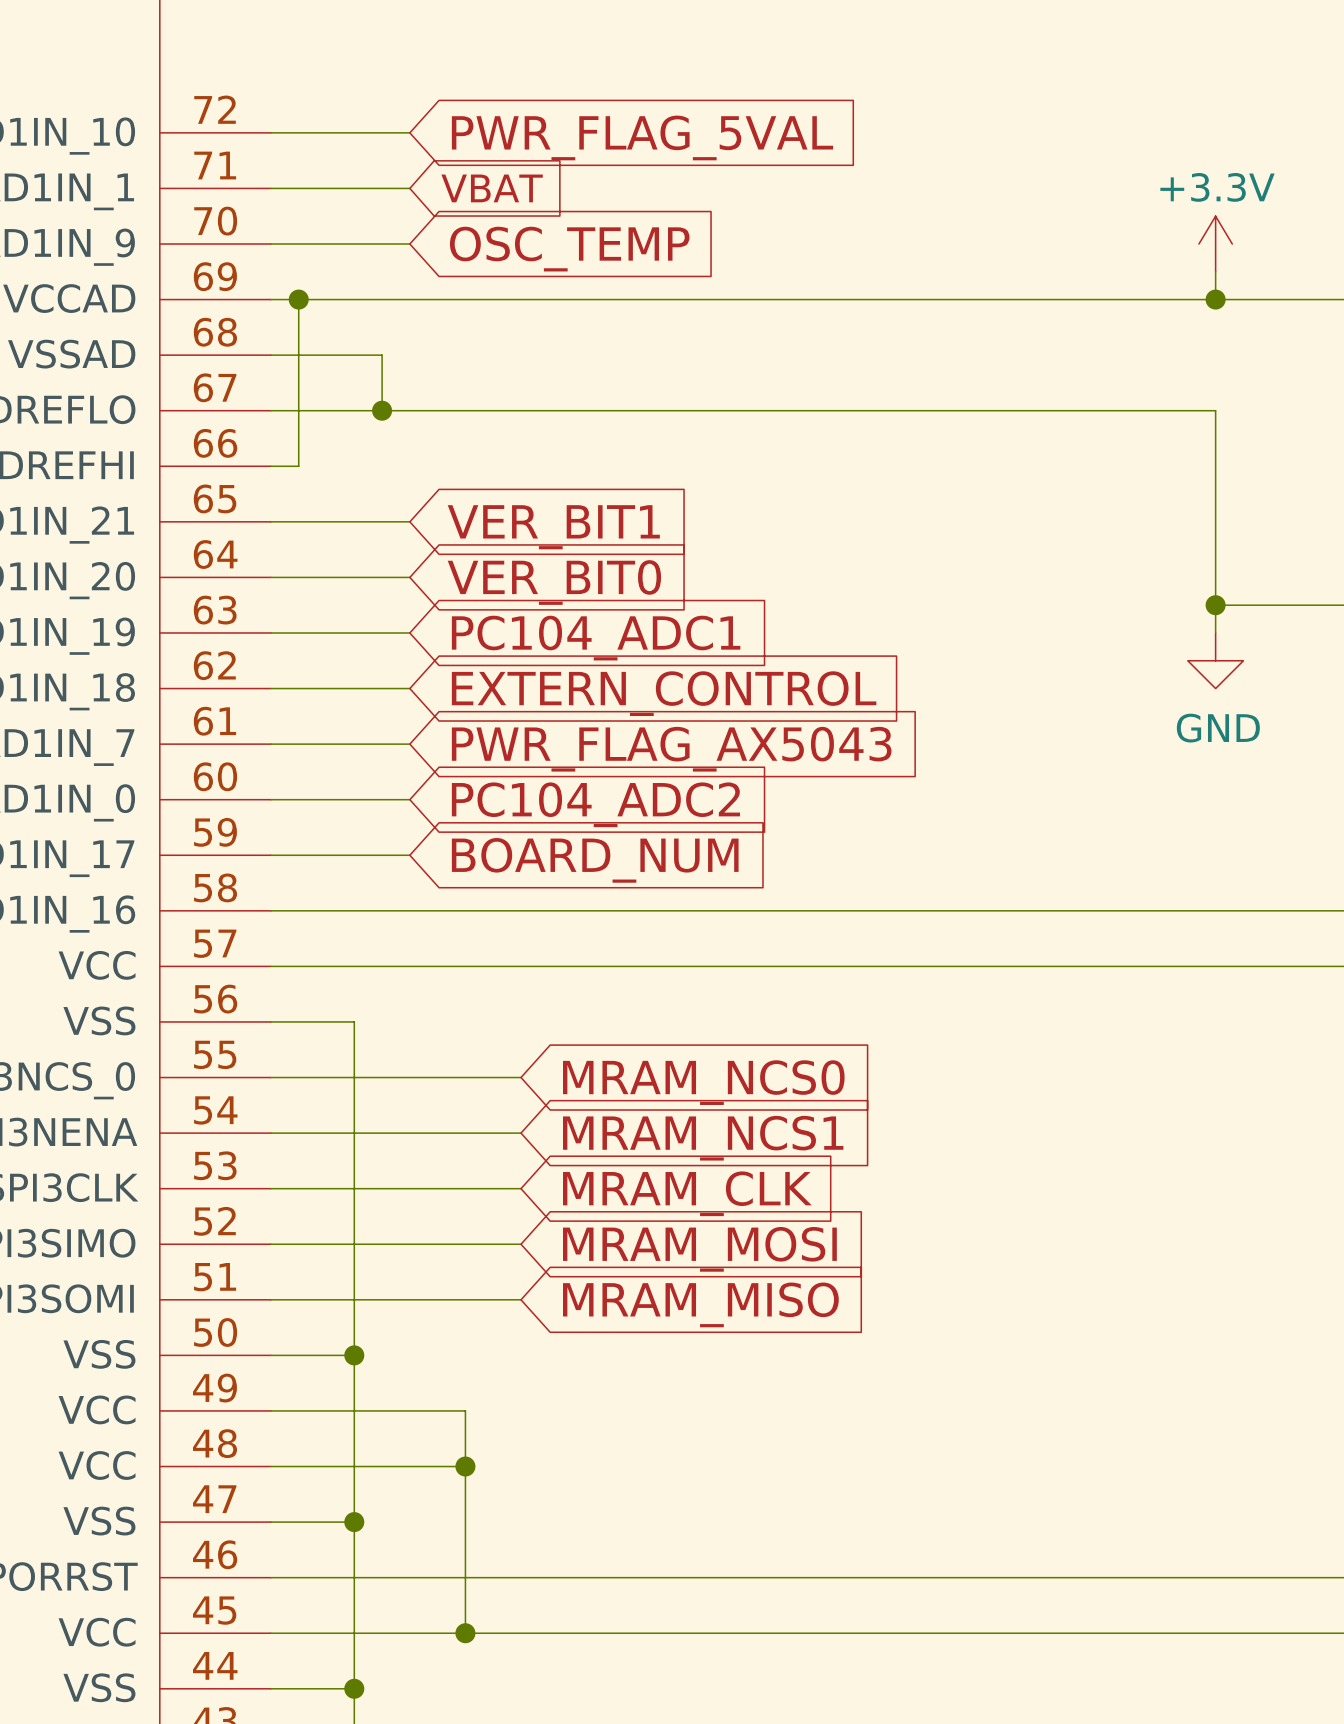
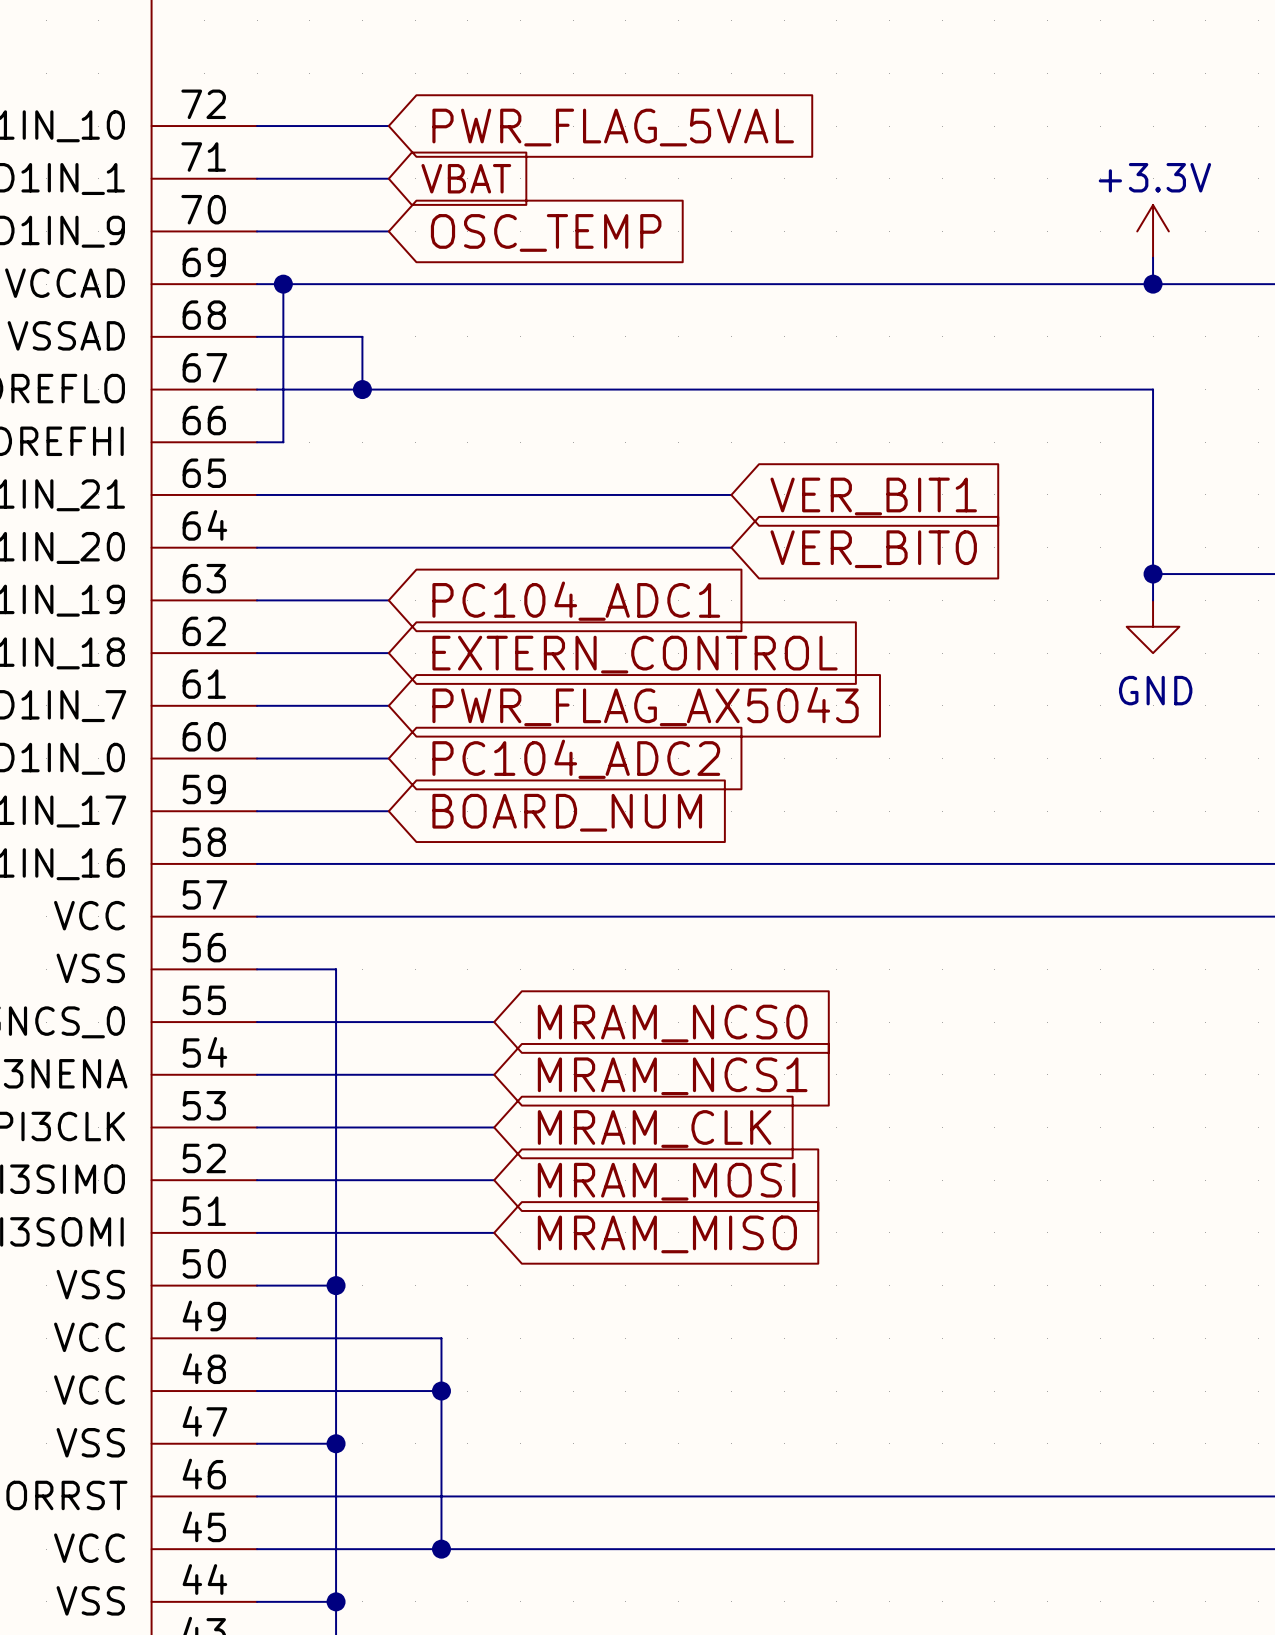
wire: none -> (388, 494) (731, 494)
global label position: VER_BIT1 (553, 527) -> VER_BIT1 (873, 496)
wire: none -> (388, 547) (731, 547)
global label position: VER_BIT0 (554, 582) -> VER_BIT0 (873, 549)

